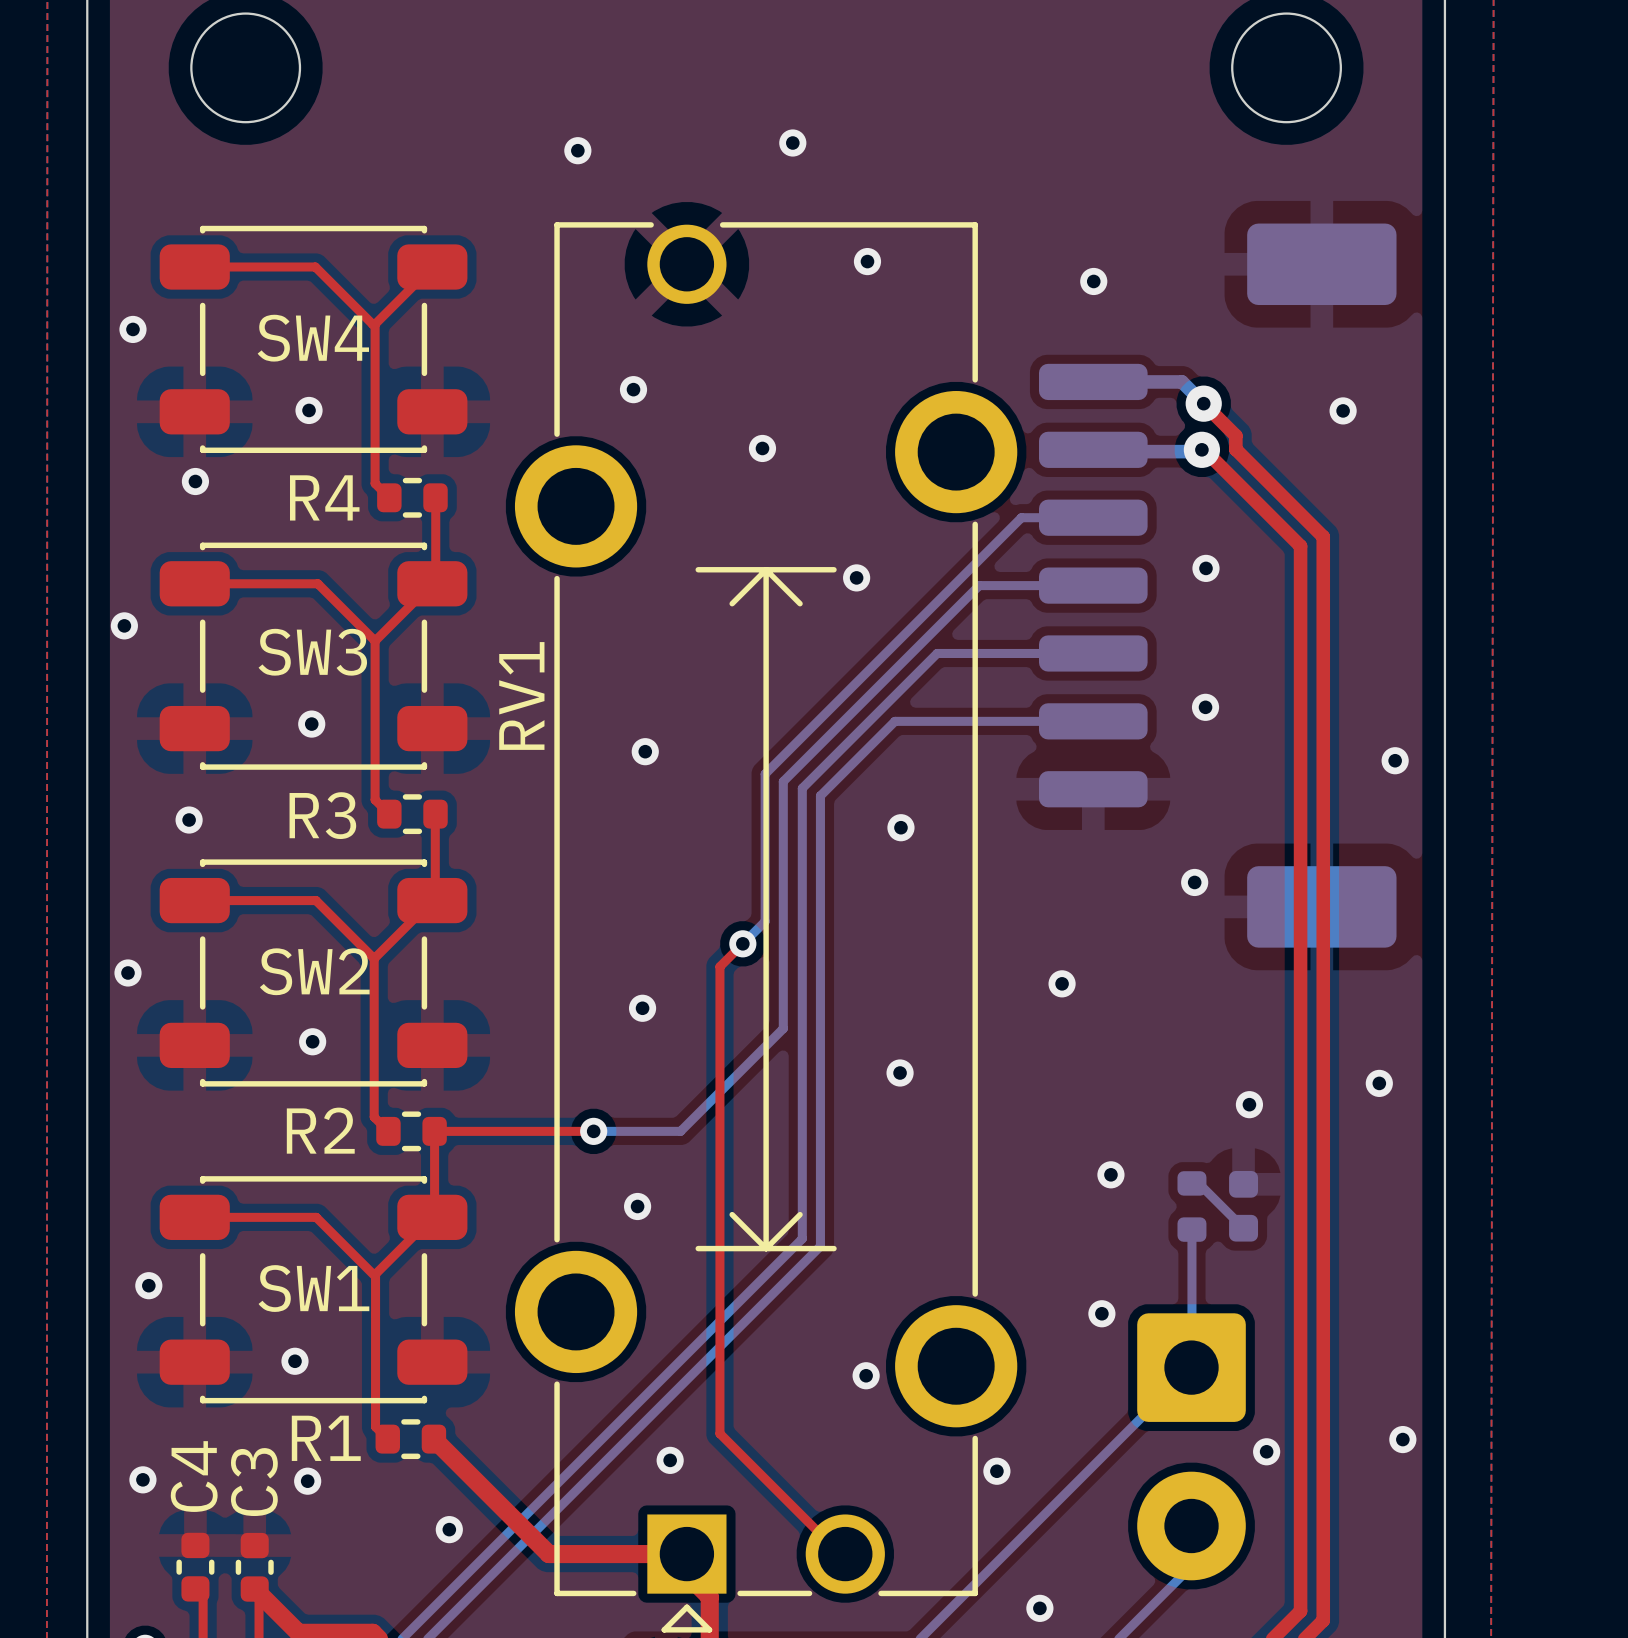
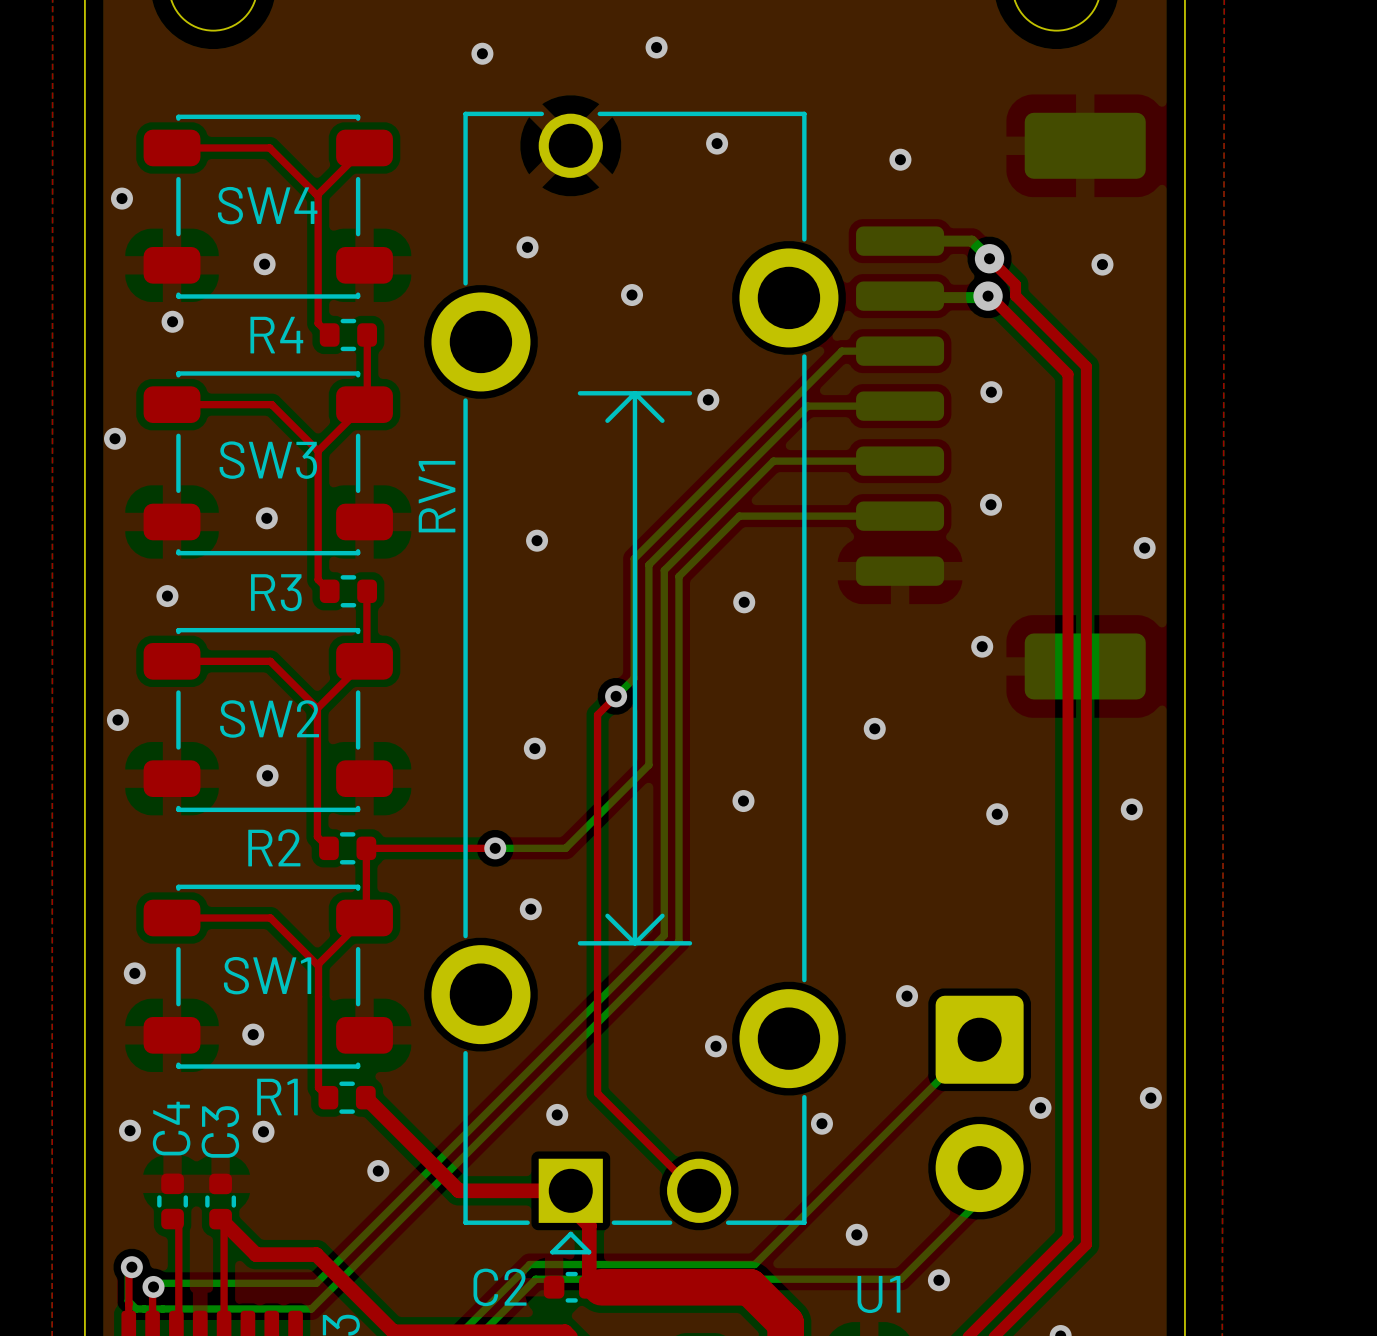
via position: (1249, 1104) -> (997, 814)
via: (1110, 1174) -> none
bottom track: (1191, 1183) (1198, 1183) (1243, 1228) -> none
part: (1191, 1206) -> none
part: (1243, 1206) -> none
bottom track: (1191, 1229) (1191, 1367) -> none

